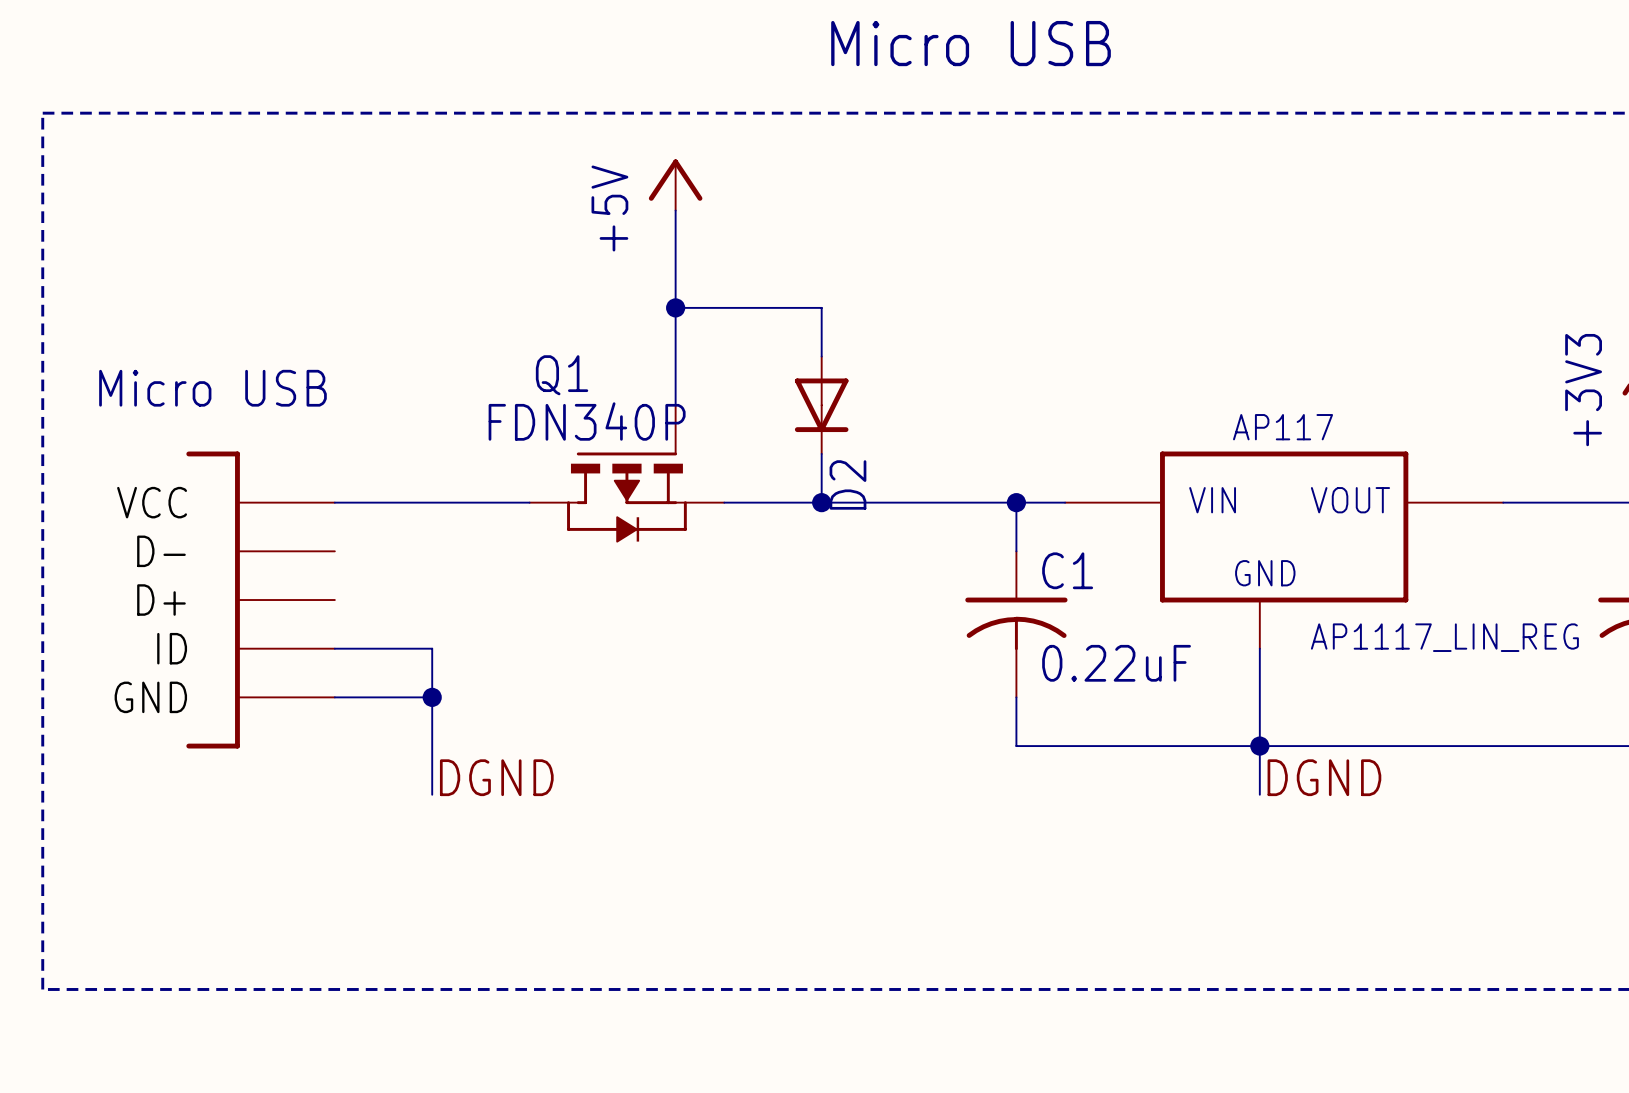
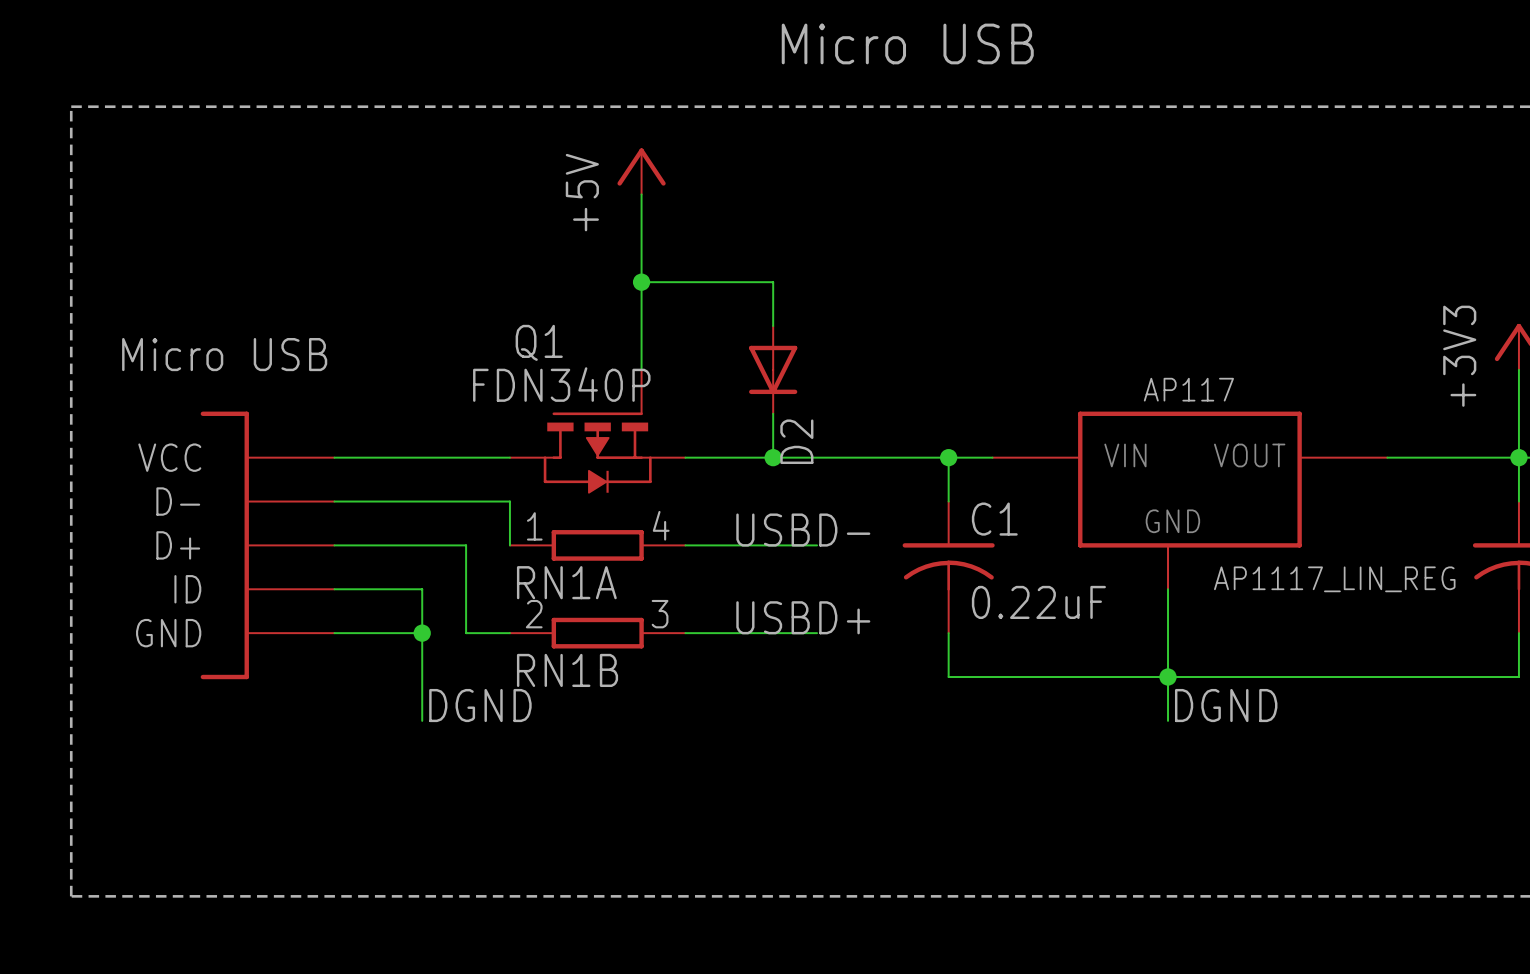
wire: none -> (334, 501) (509, 501) (509, 545)
label: none -> USBD- (803, 530)
wire: none -> (334, 545) (466, 545) (466, 633) (509, 633)
RN1A: none -> (597, 545)
wire: none -> (685, 545) (817, 545)
label: none -> USBD+ (803, 617)
RN1B: none -> (597, 633)
wire: none -> (685, 633) (817, 633)

